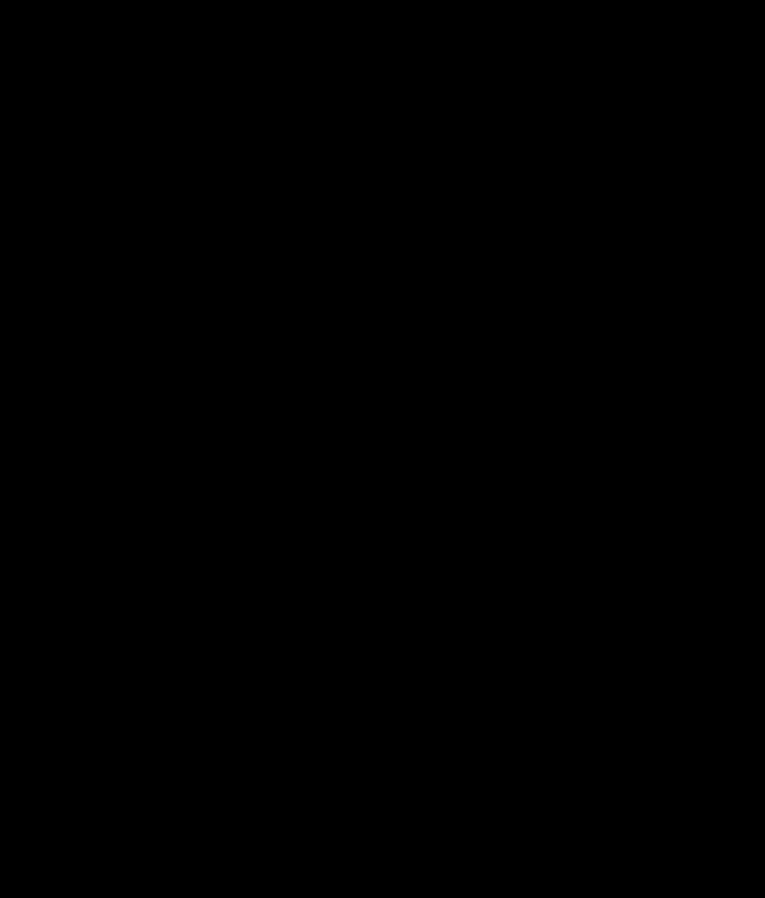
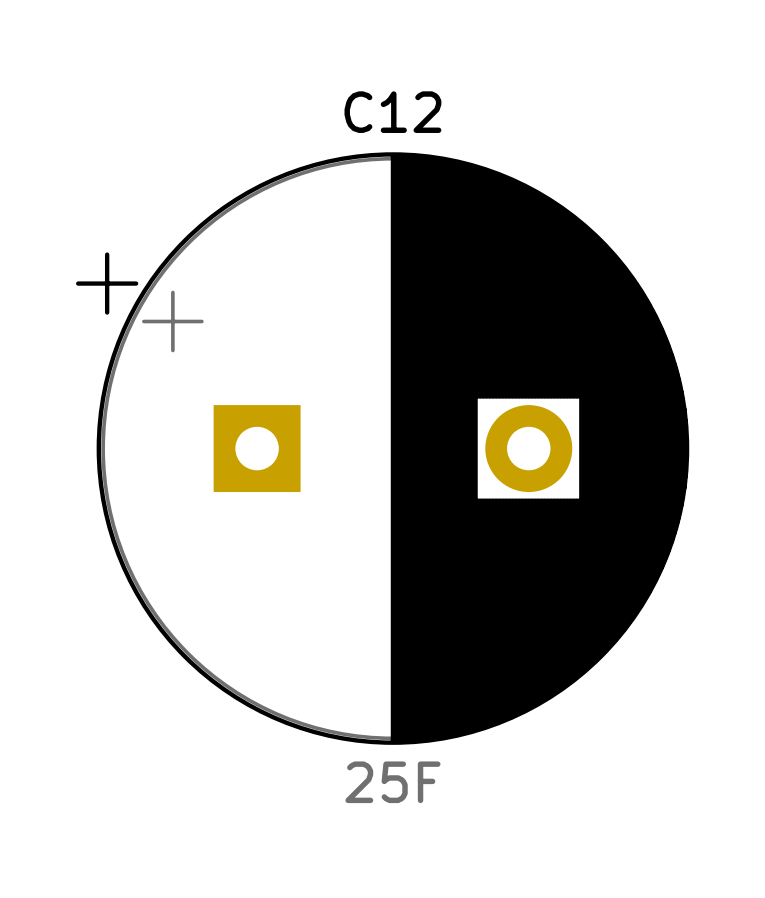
C12: none -> 25F (382, 448)

